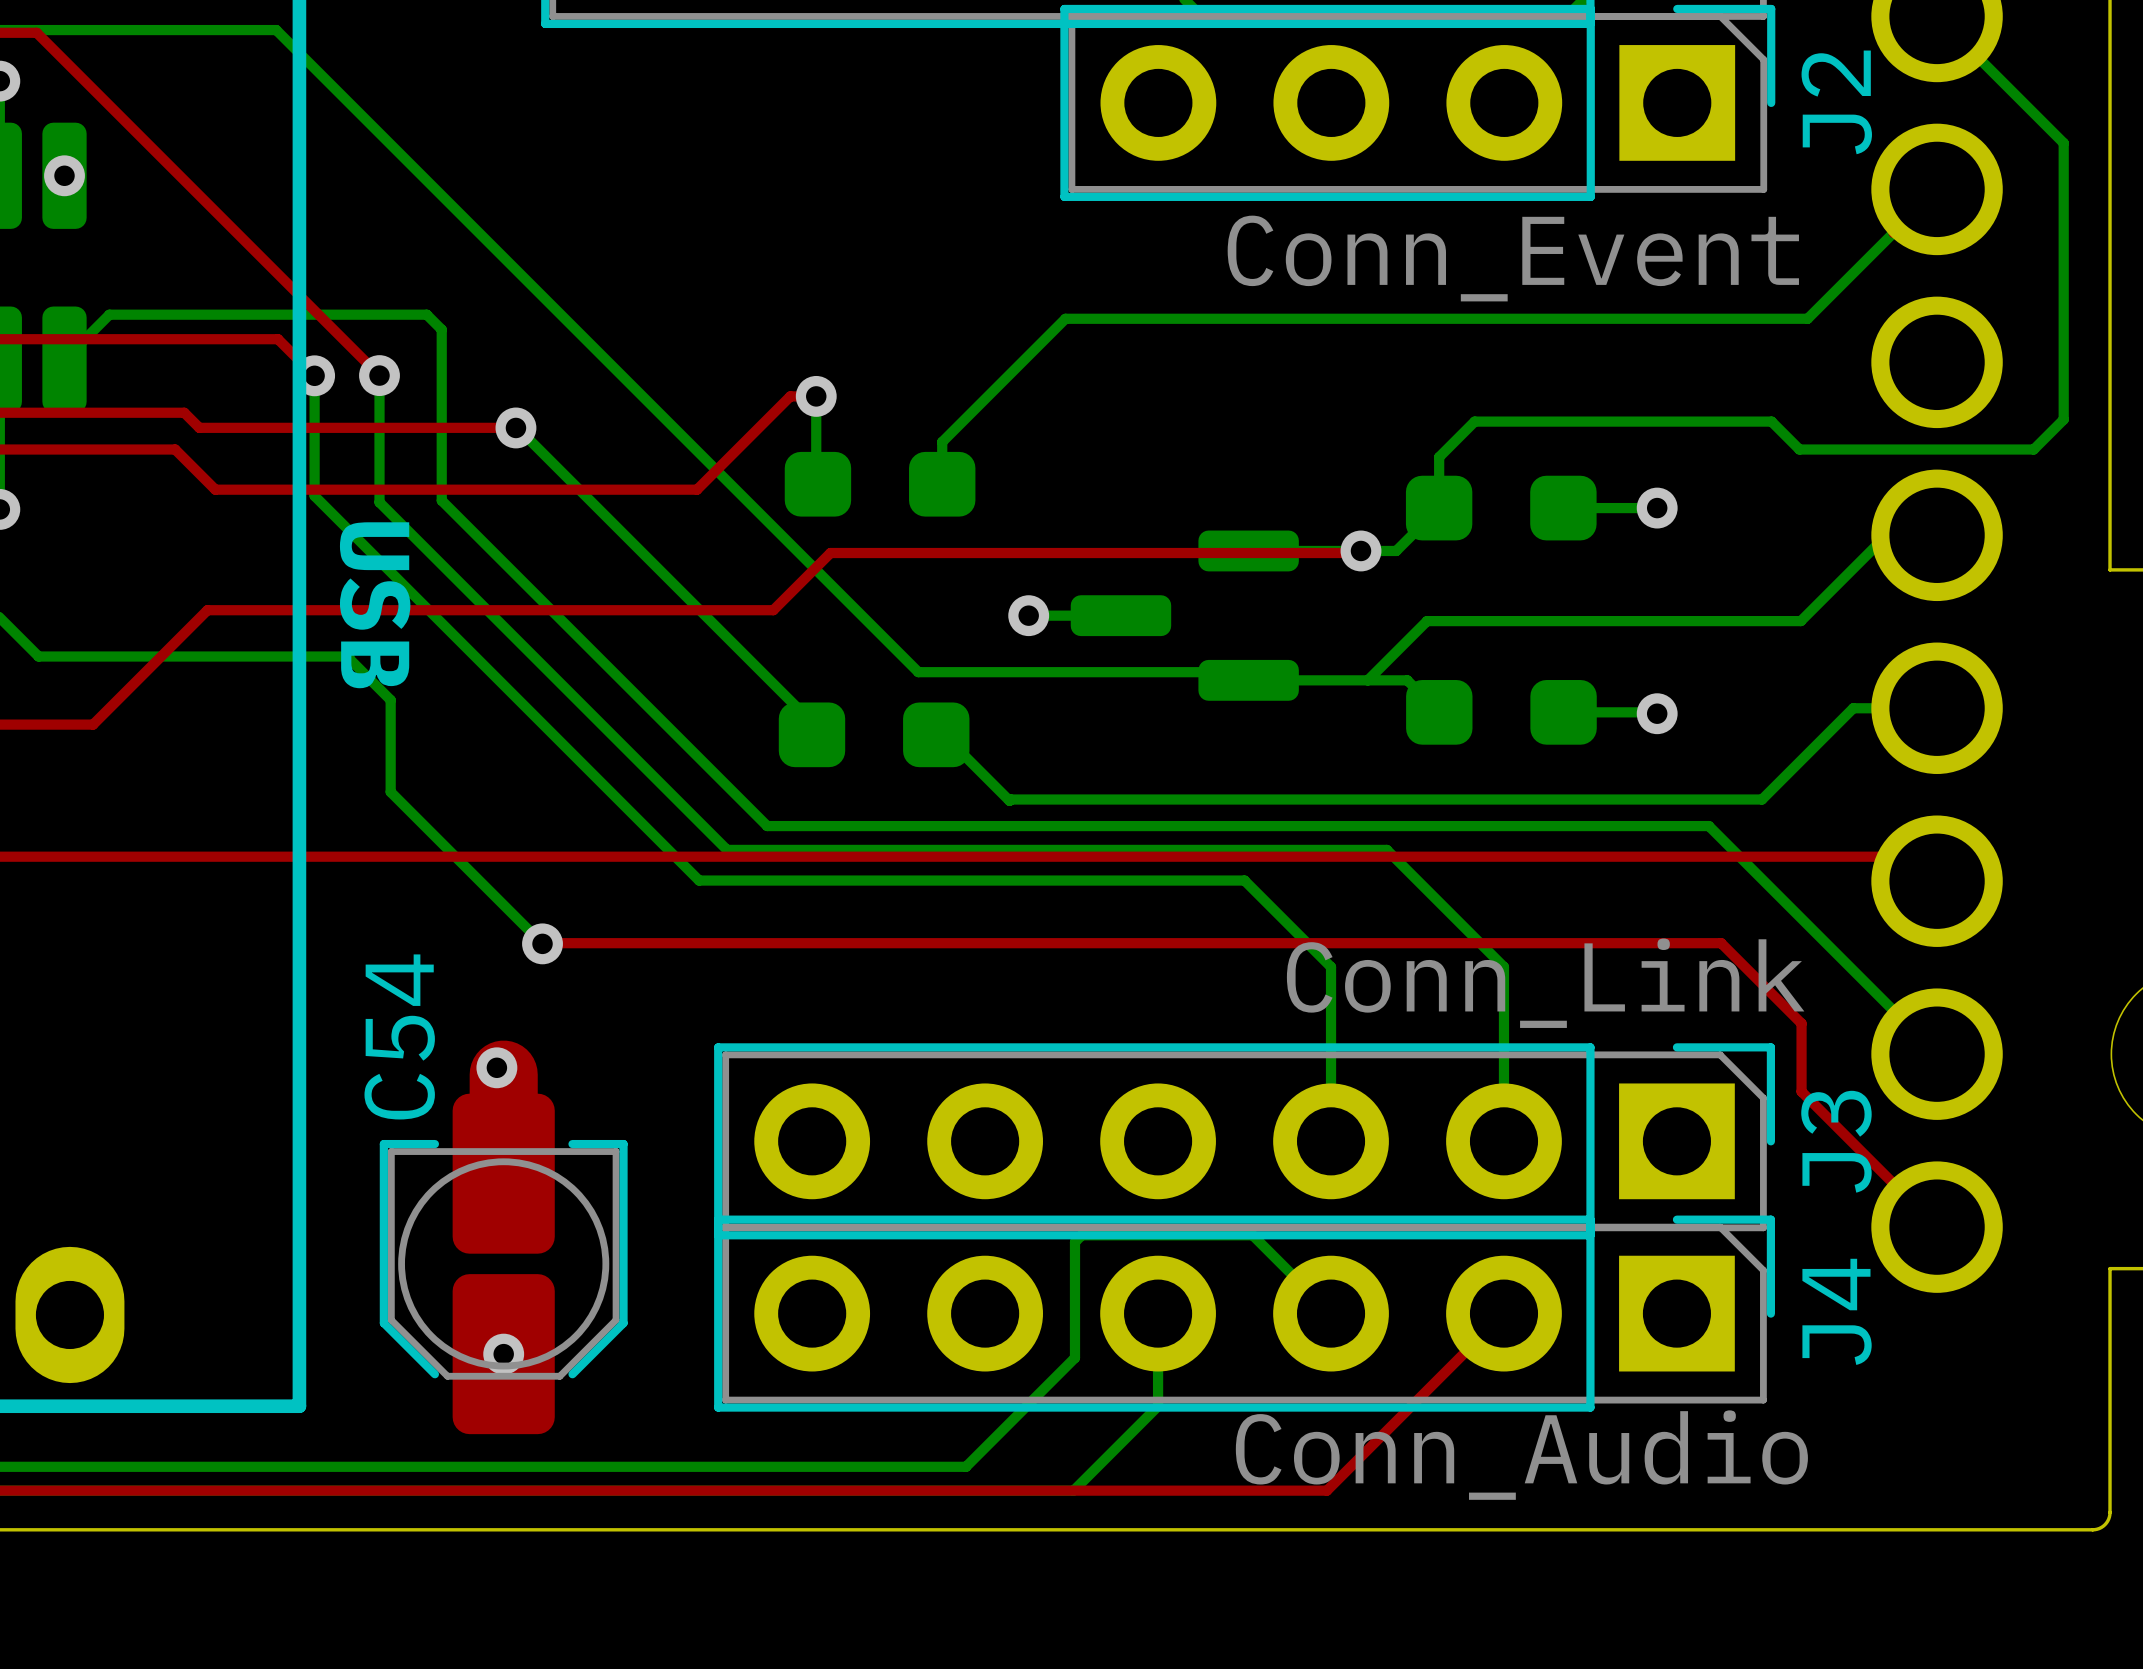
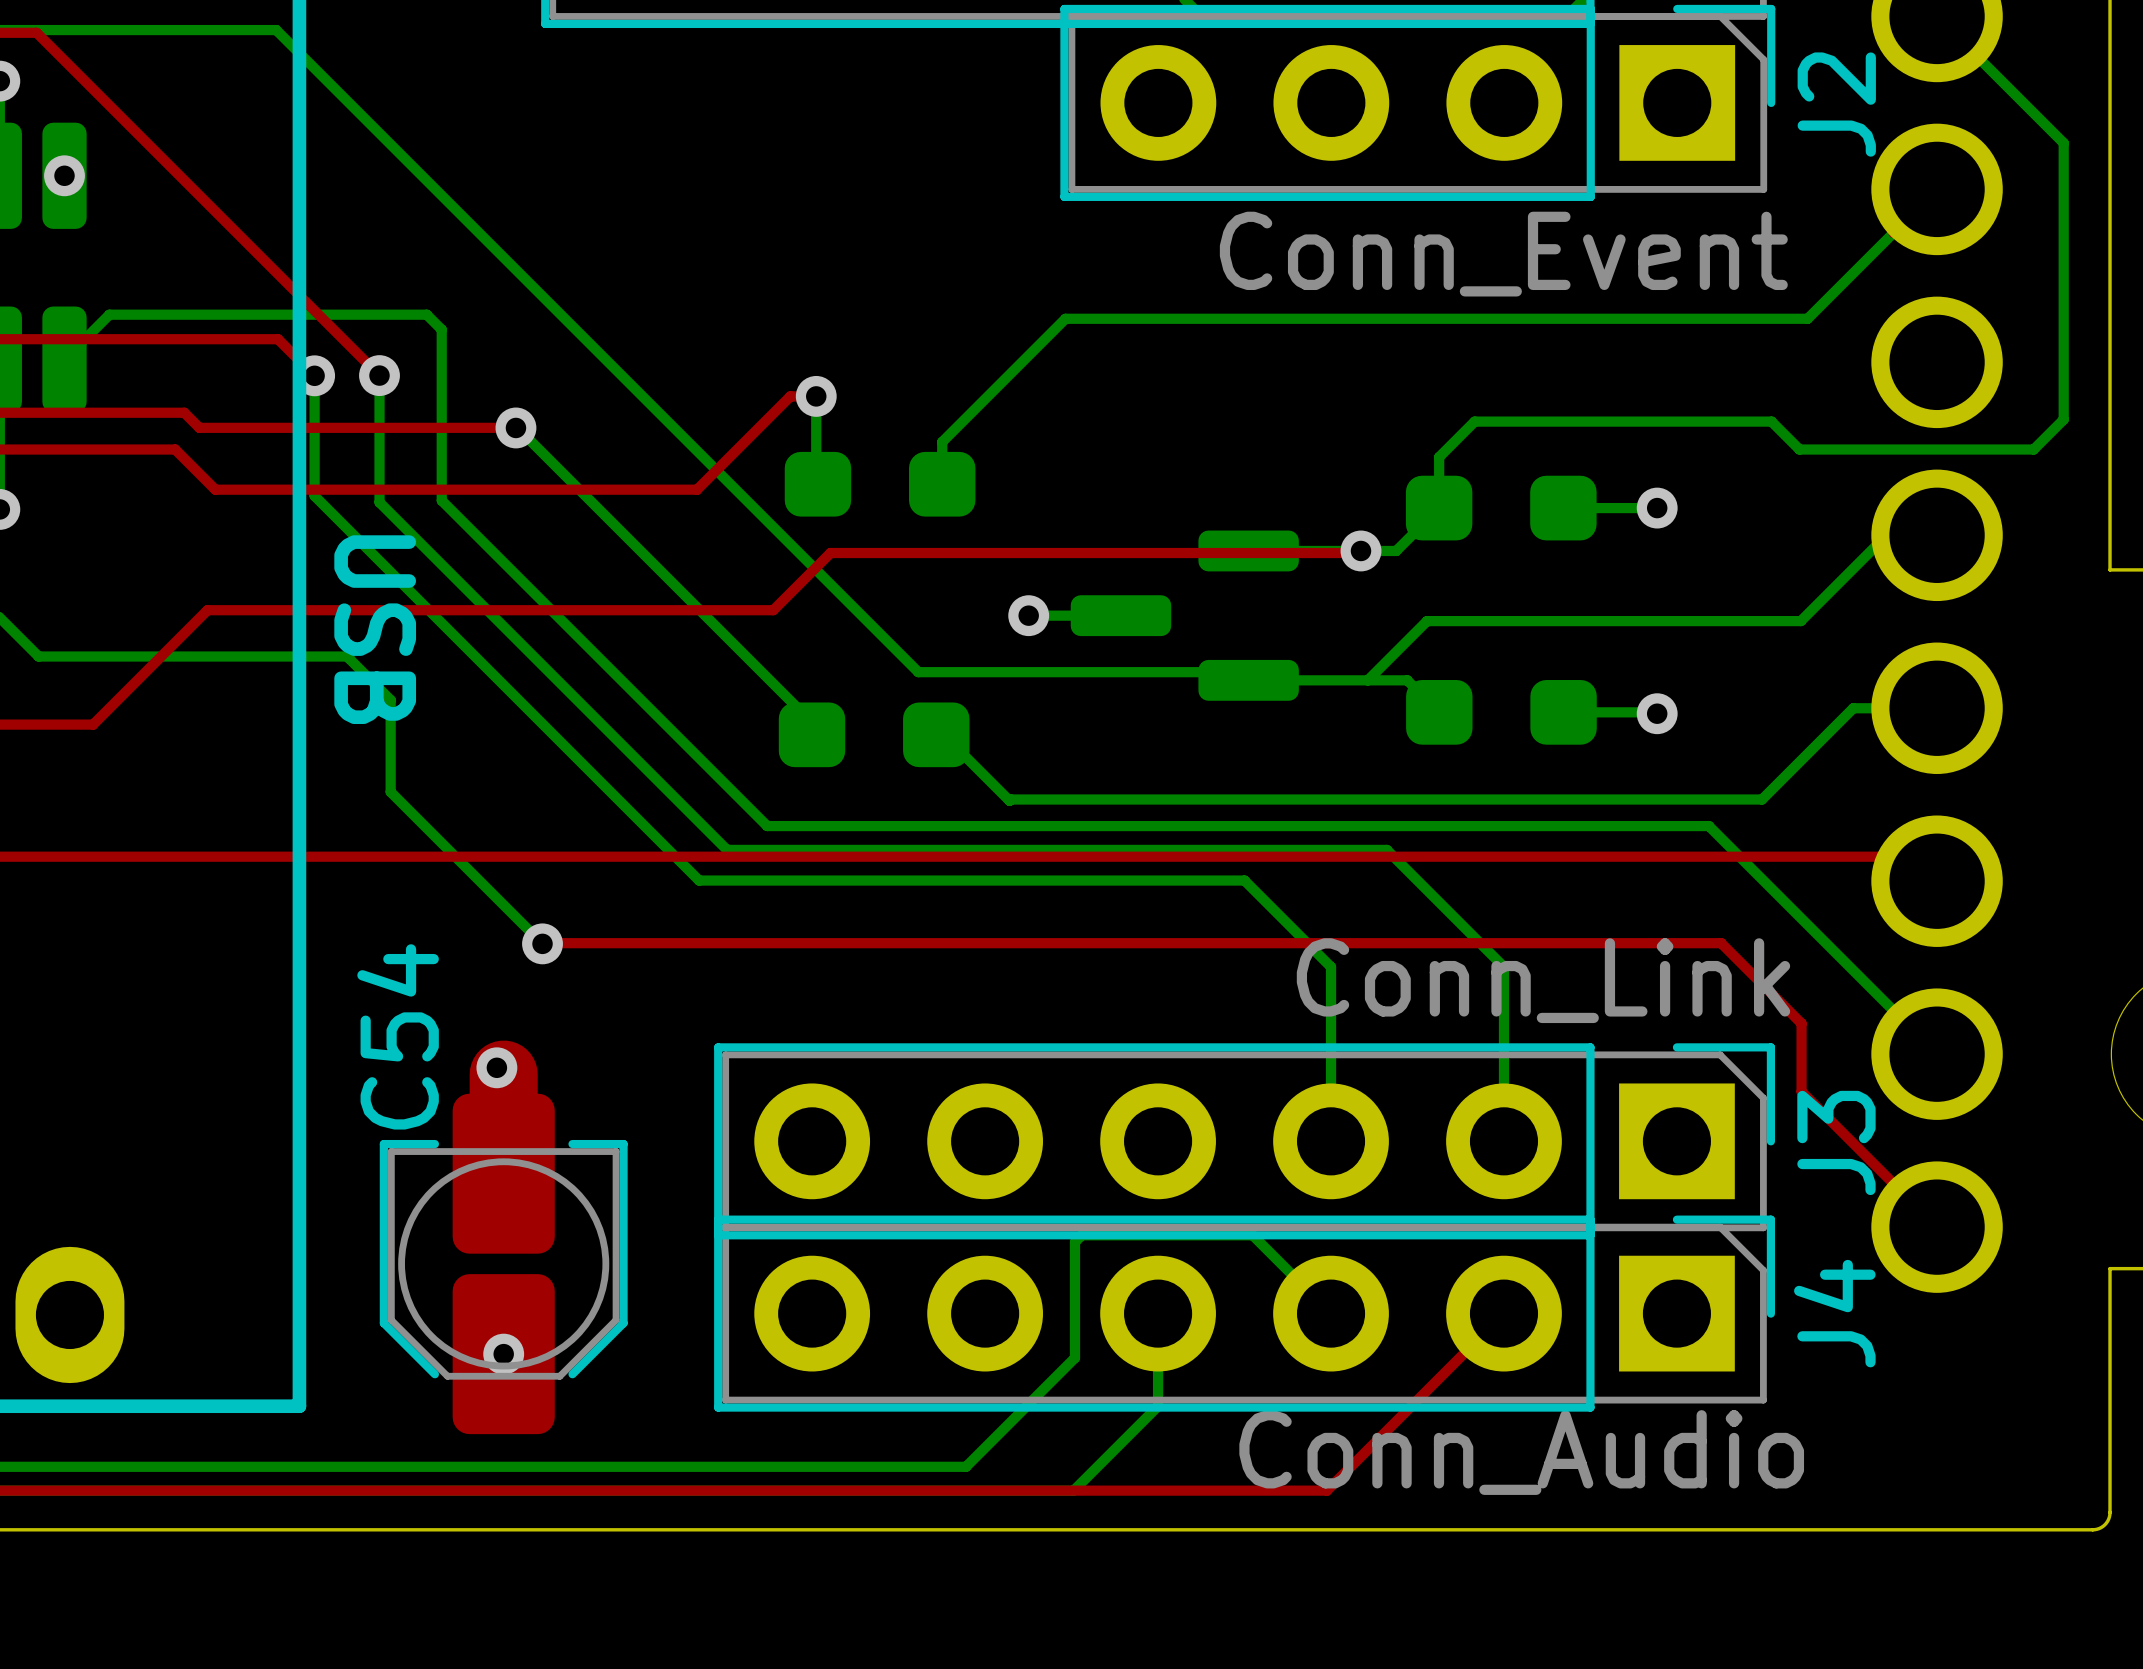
J2 value position: Conn_Event (1513, 258) -> Conn_Event (1503, 254)

